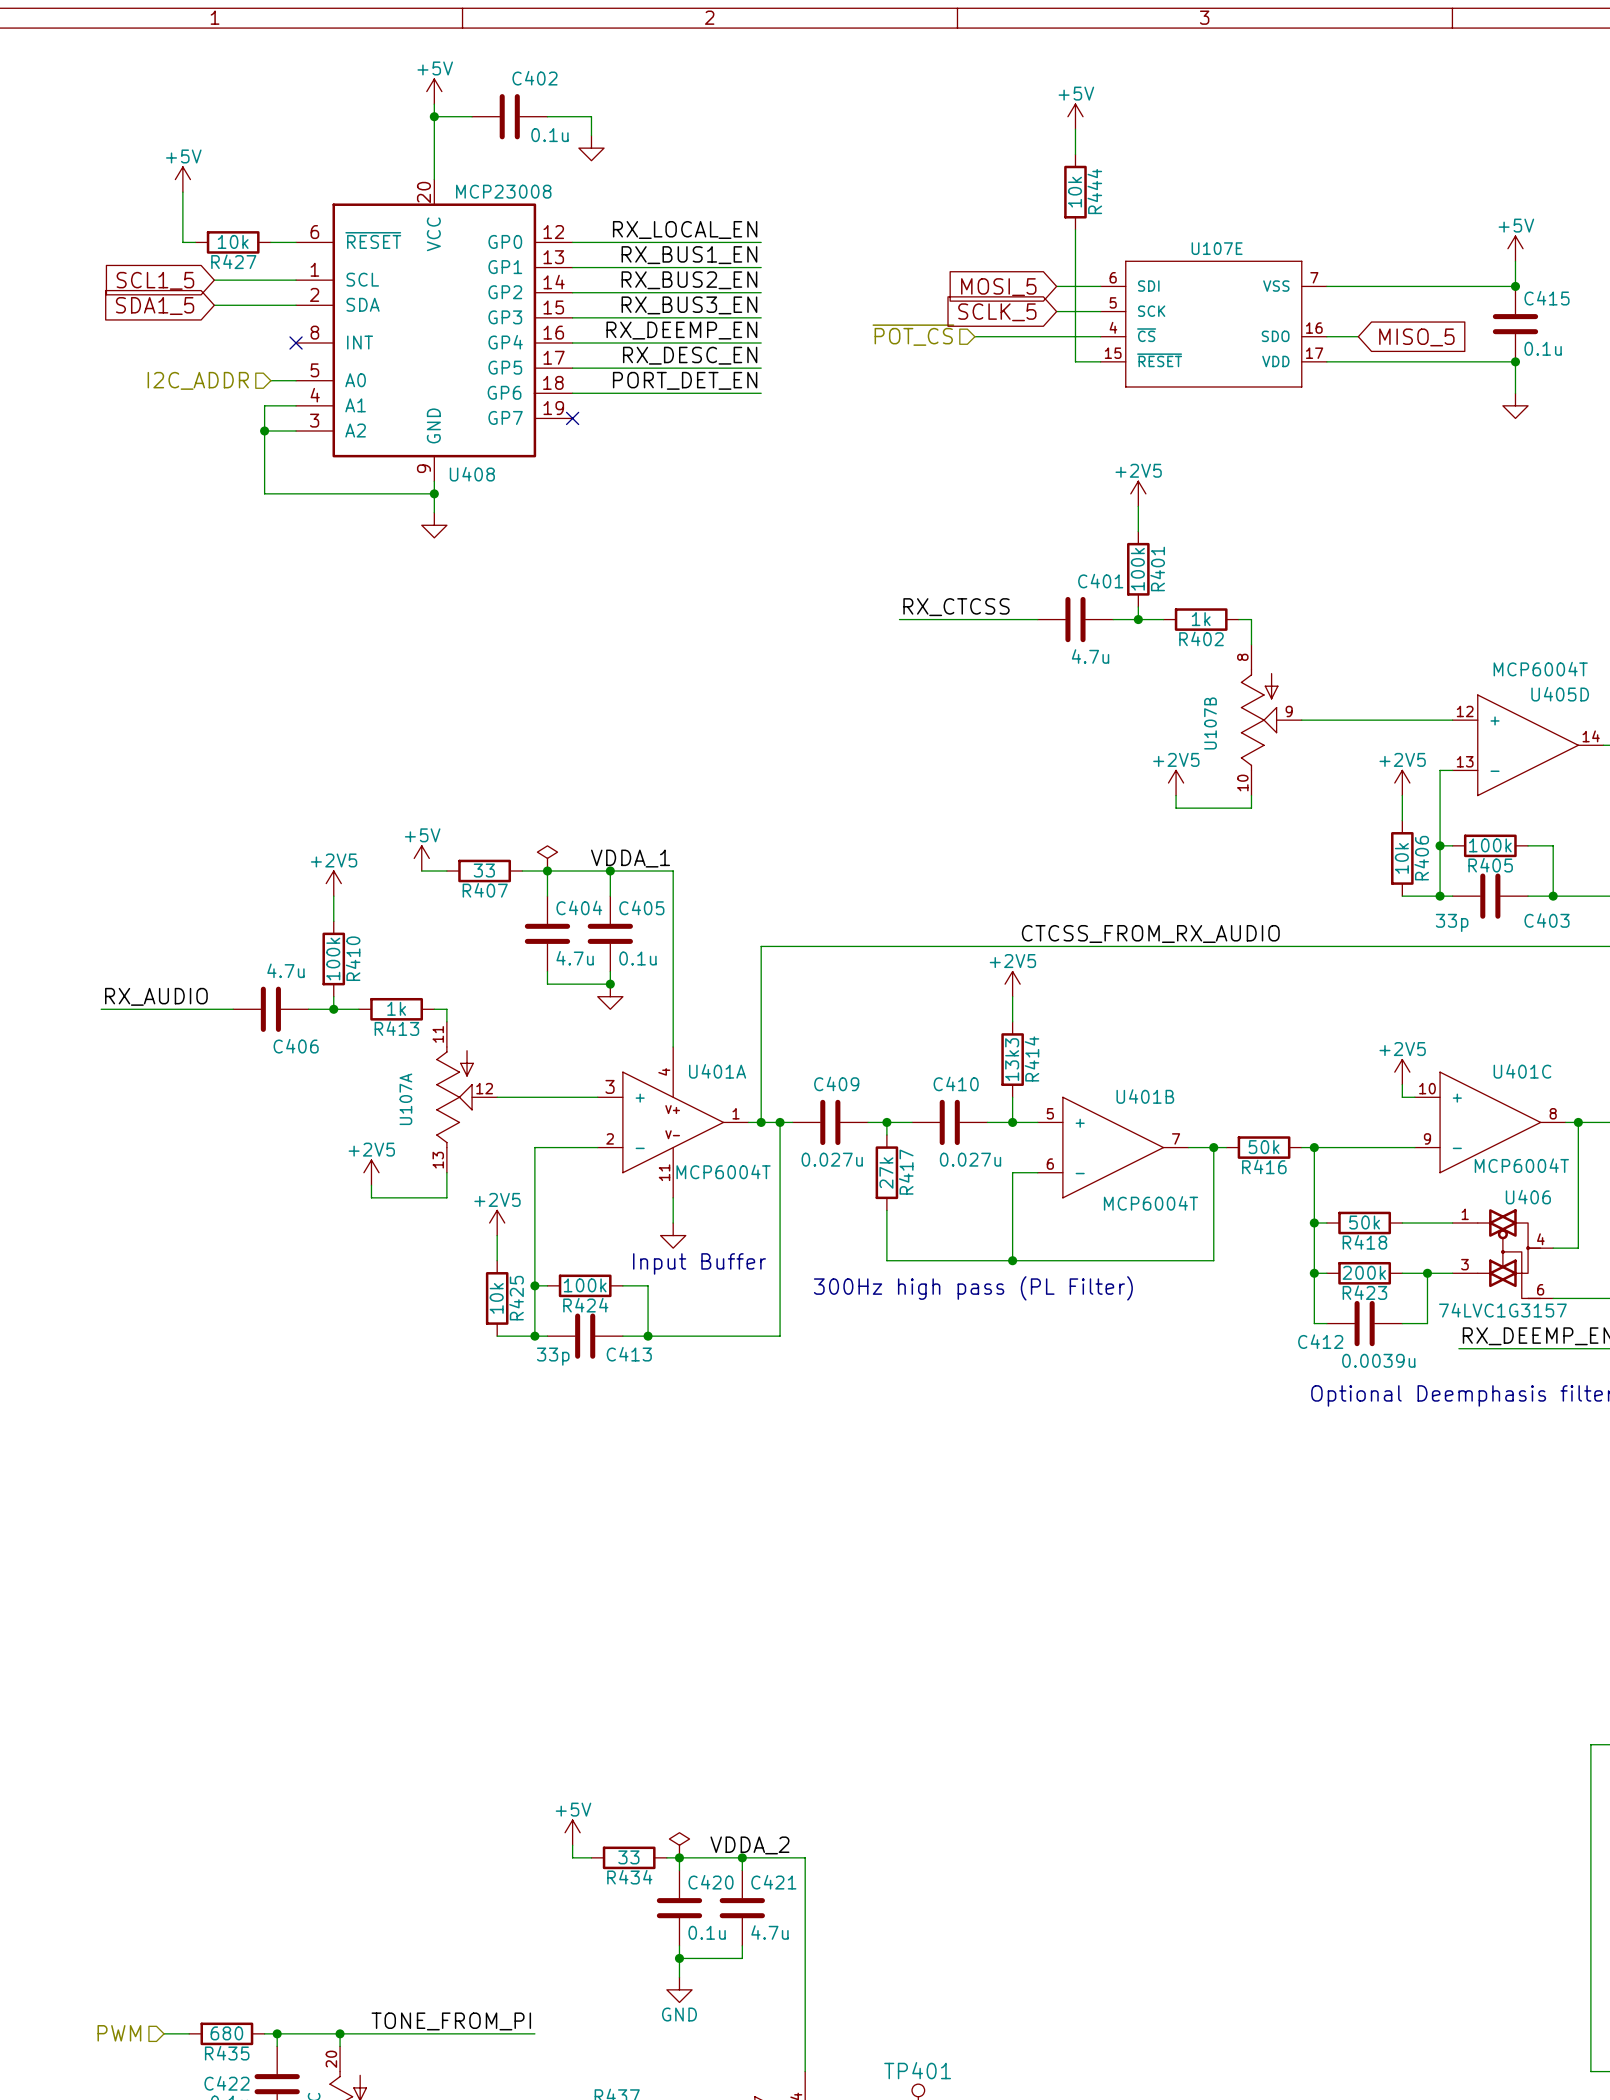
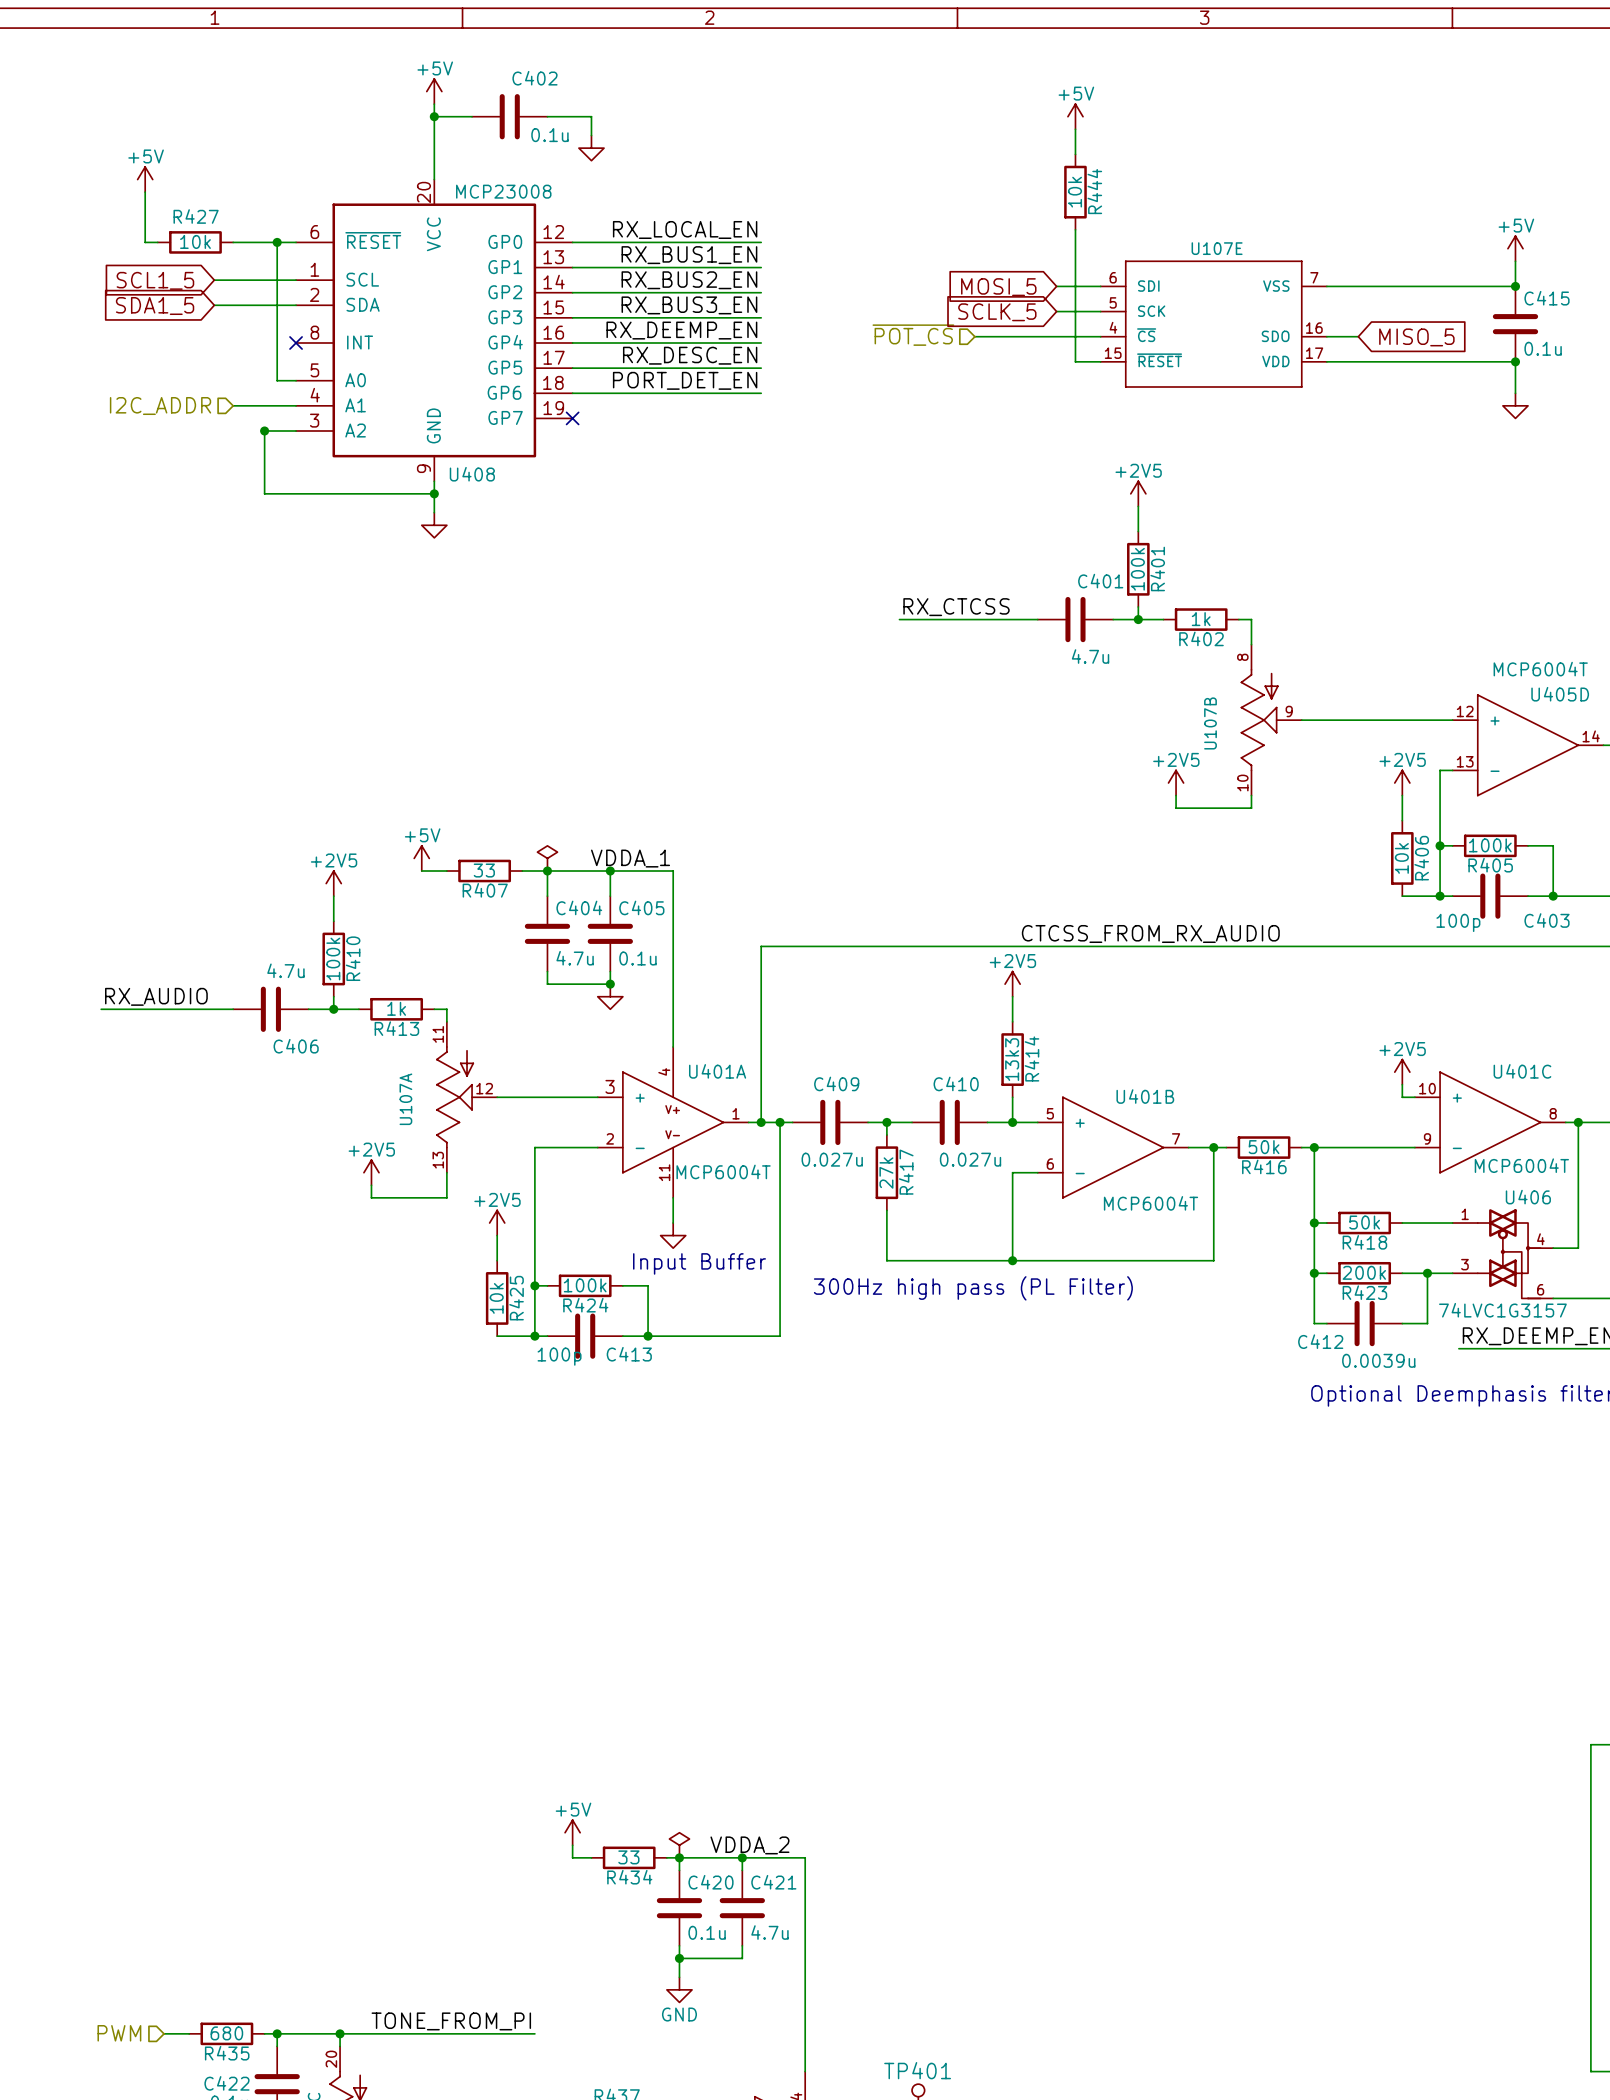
power symbol position: +5V (182, 179) -> +5V (145, 179)
wire: (182, 192) (182, 242) (195, 242) -> (145, 192) (145, 242) (157, 242)
wire: none -> (233, 242) (270, 242)
R427 position: (233, 242) -> (195, 242)
junction: none -> (277, 242)
R427 name position: R427 (233, 261) -> R427 (196, 216)
hierarchical label position: I2C_ADDR (198, 380) -> I2C_ADDR (160, 406)
wire: (270, 380) (277, 380) -> (277, 242) (277, 380)
wire: (264, 405) (264, 430) -> (264, 405) (233, 405)
C403 value: 33p (1452, 922) -> 100p (1458, 922)
C413 value: 33p (553, 1356) -> 100p (559, 1356)

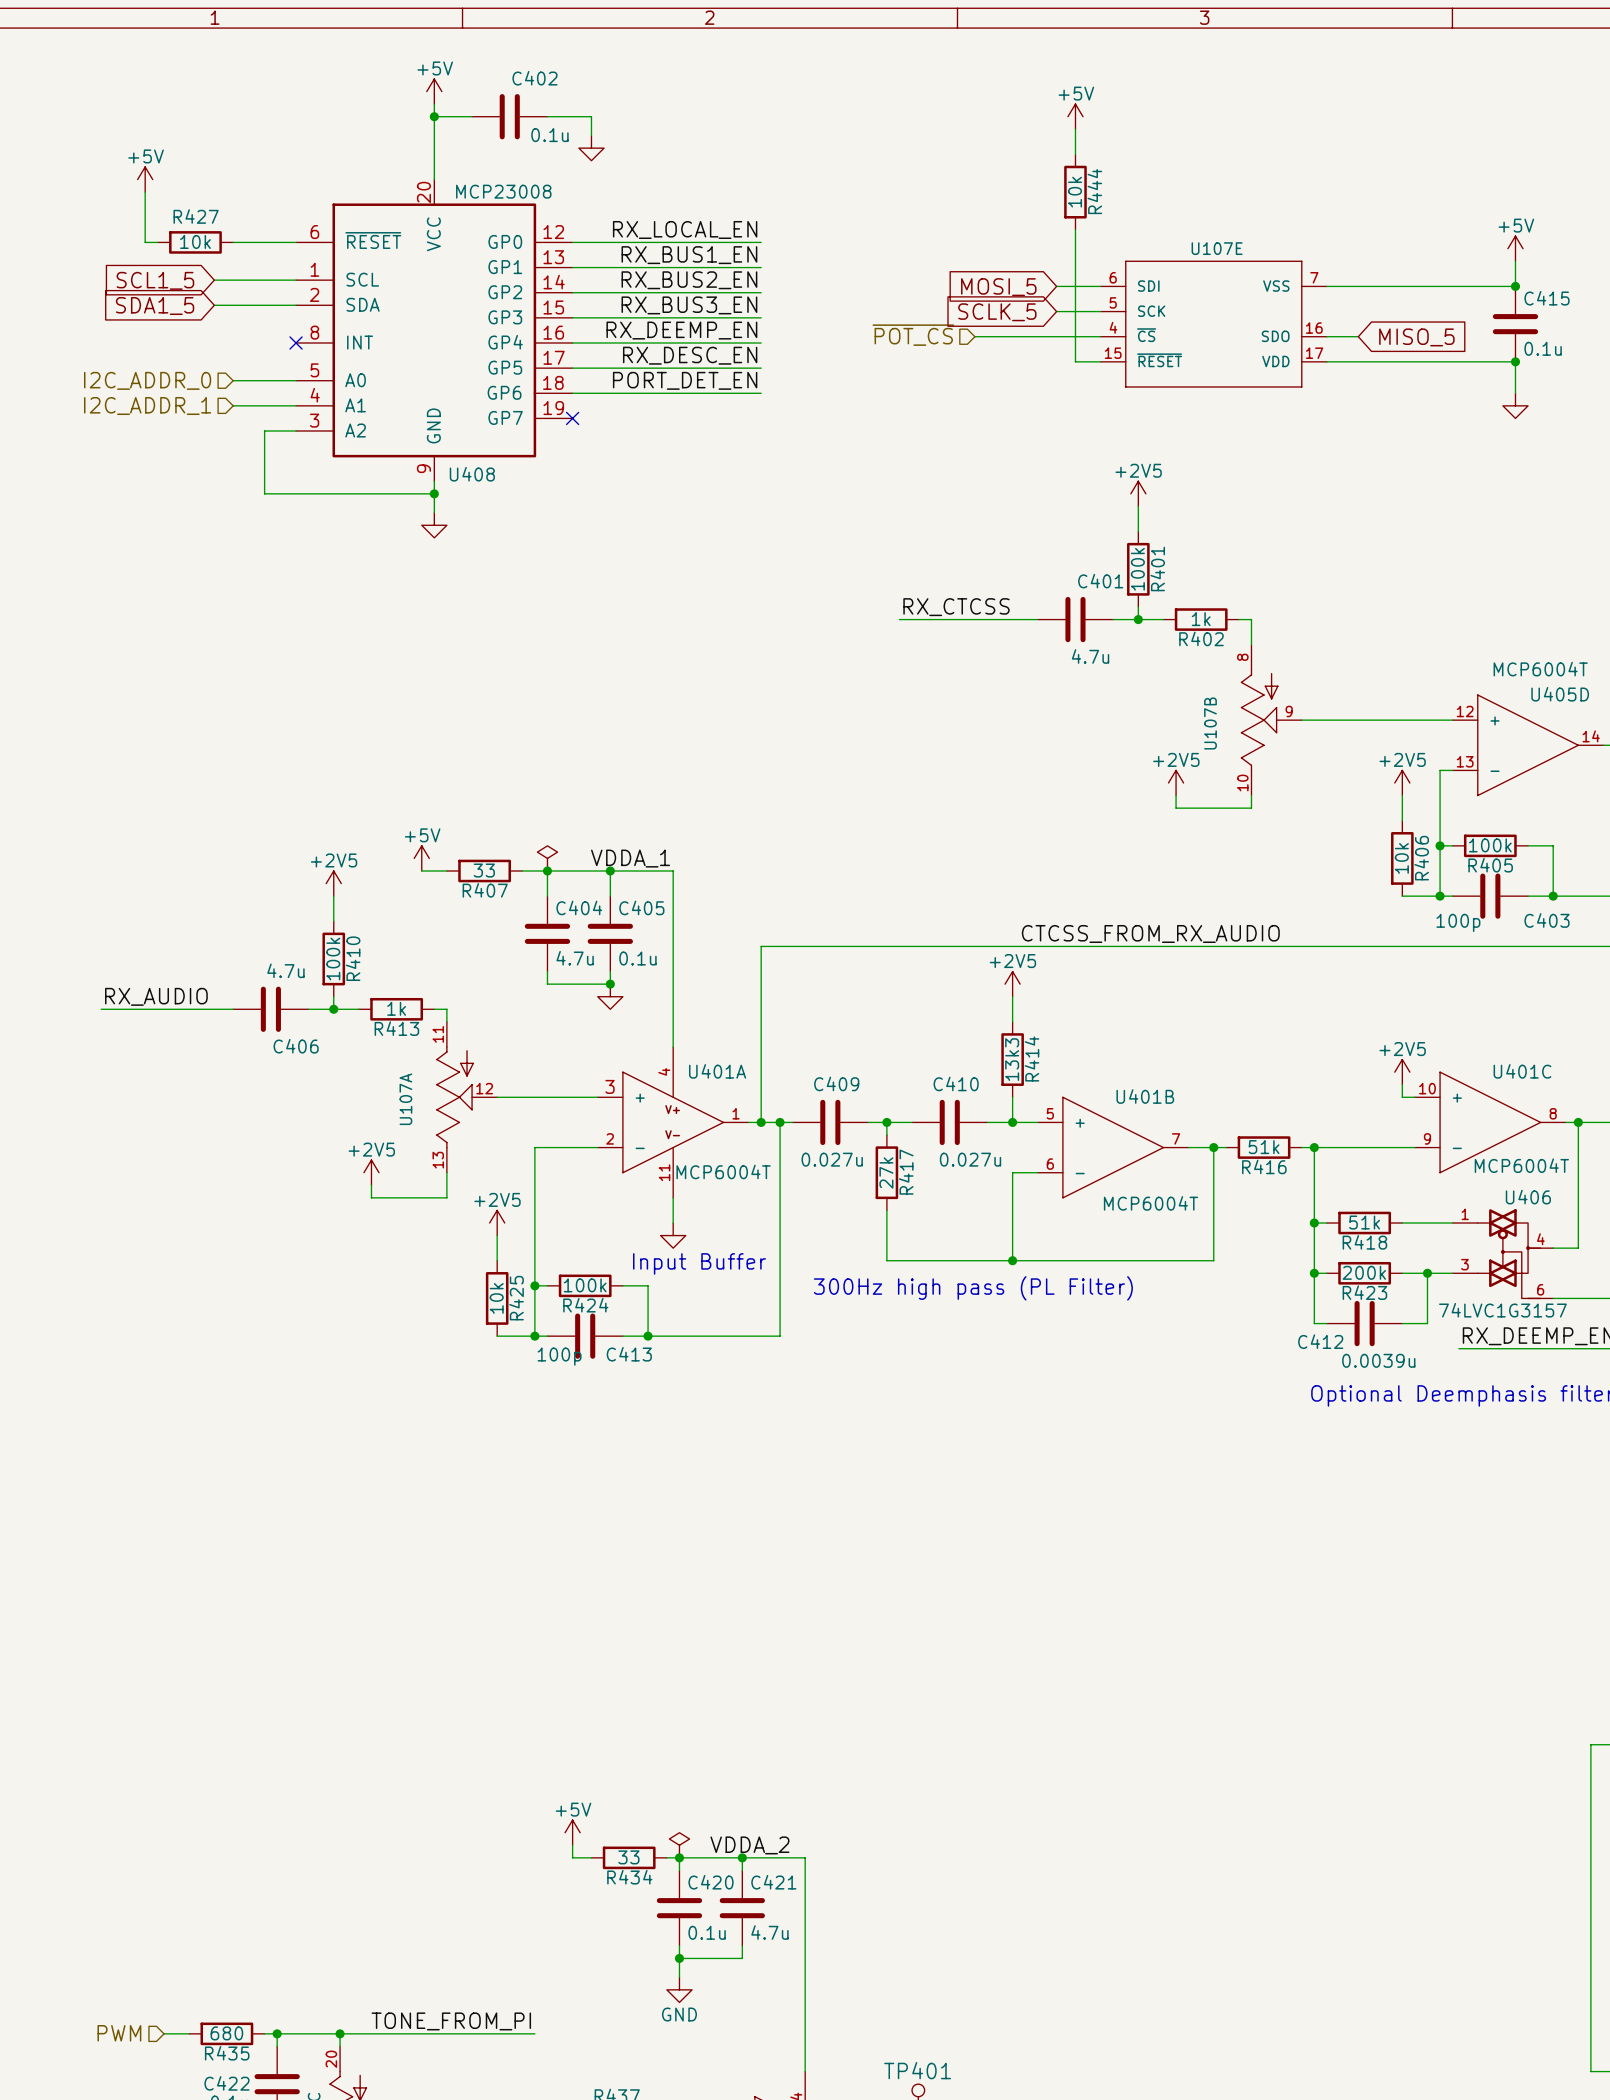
wire: (277, 242) (277, 380) -> (233, 380) (277, 380)
junction: (277, 242) -> none
hierarchical label: none -> I2C_ADDR_0 (147, 380)
hierarchical label: I2C_ADDR (160, 406) -> I2C_ADDR_1 (147, 406)
junction: (264, 430) -> none
R416 value: 50k (1264, 1147) -> 51k (1264, 1147)
R418 value: 50k (1364, 1222) -> 51k (1364, 1222)

